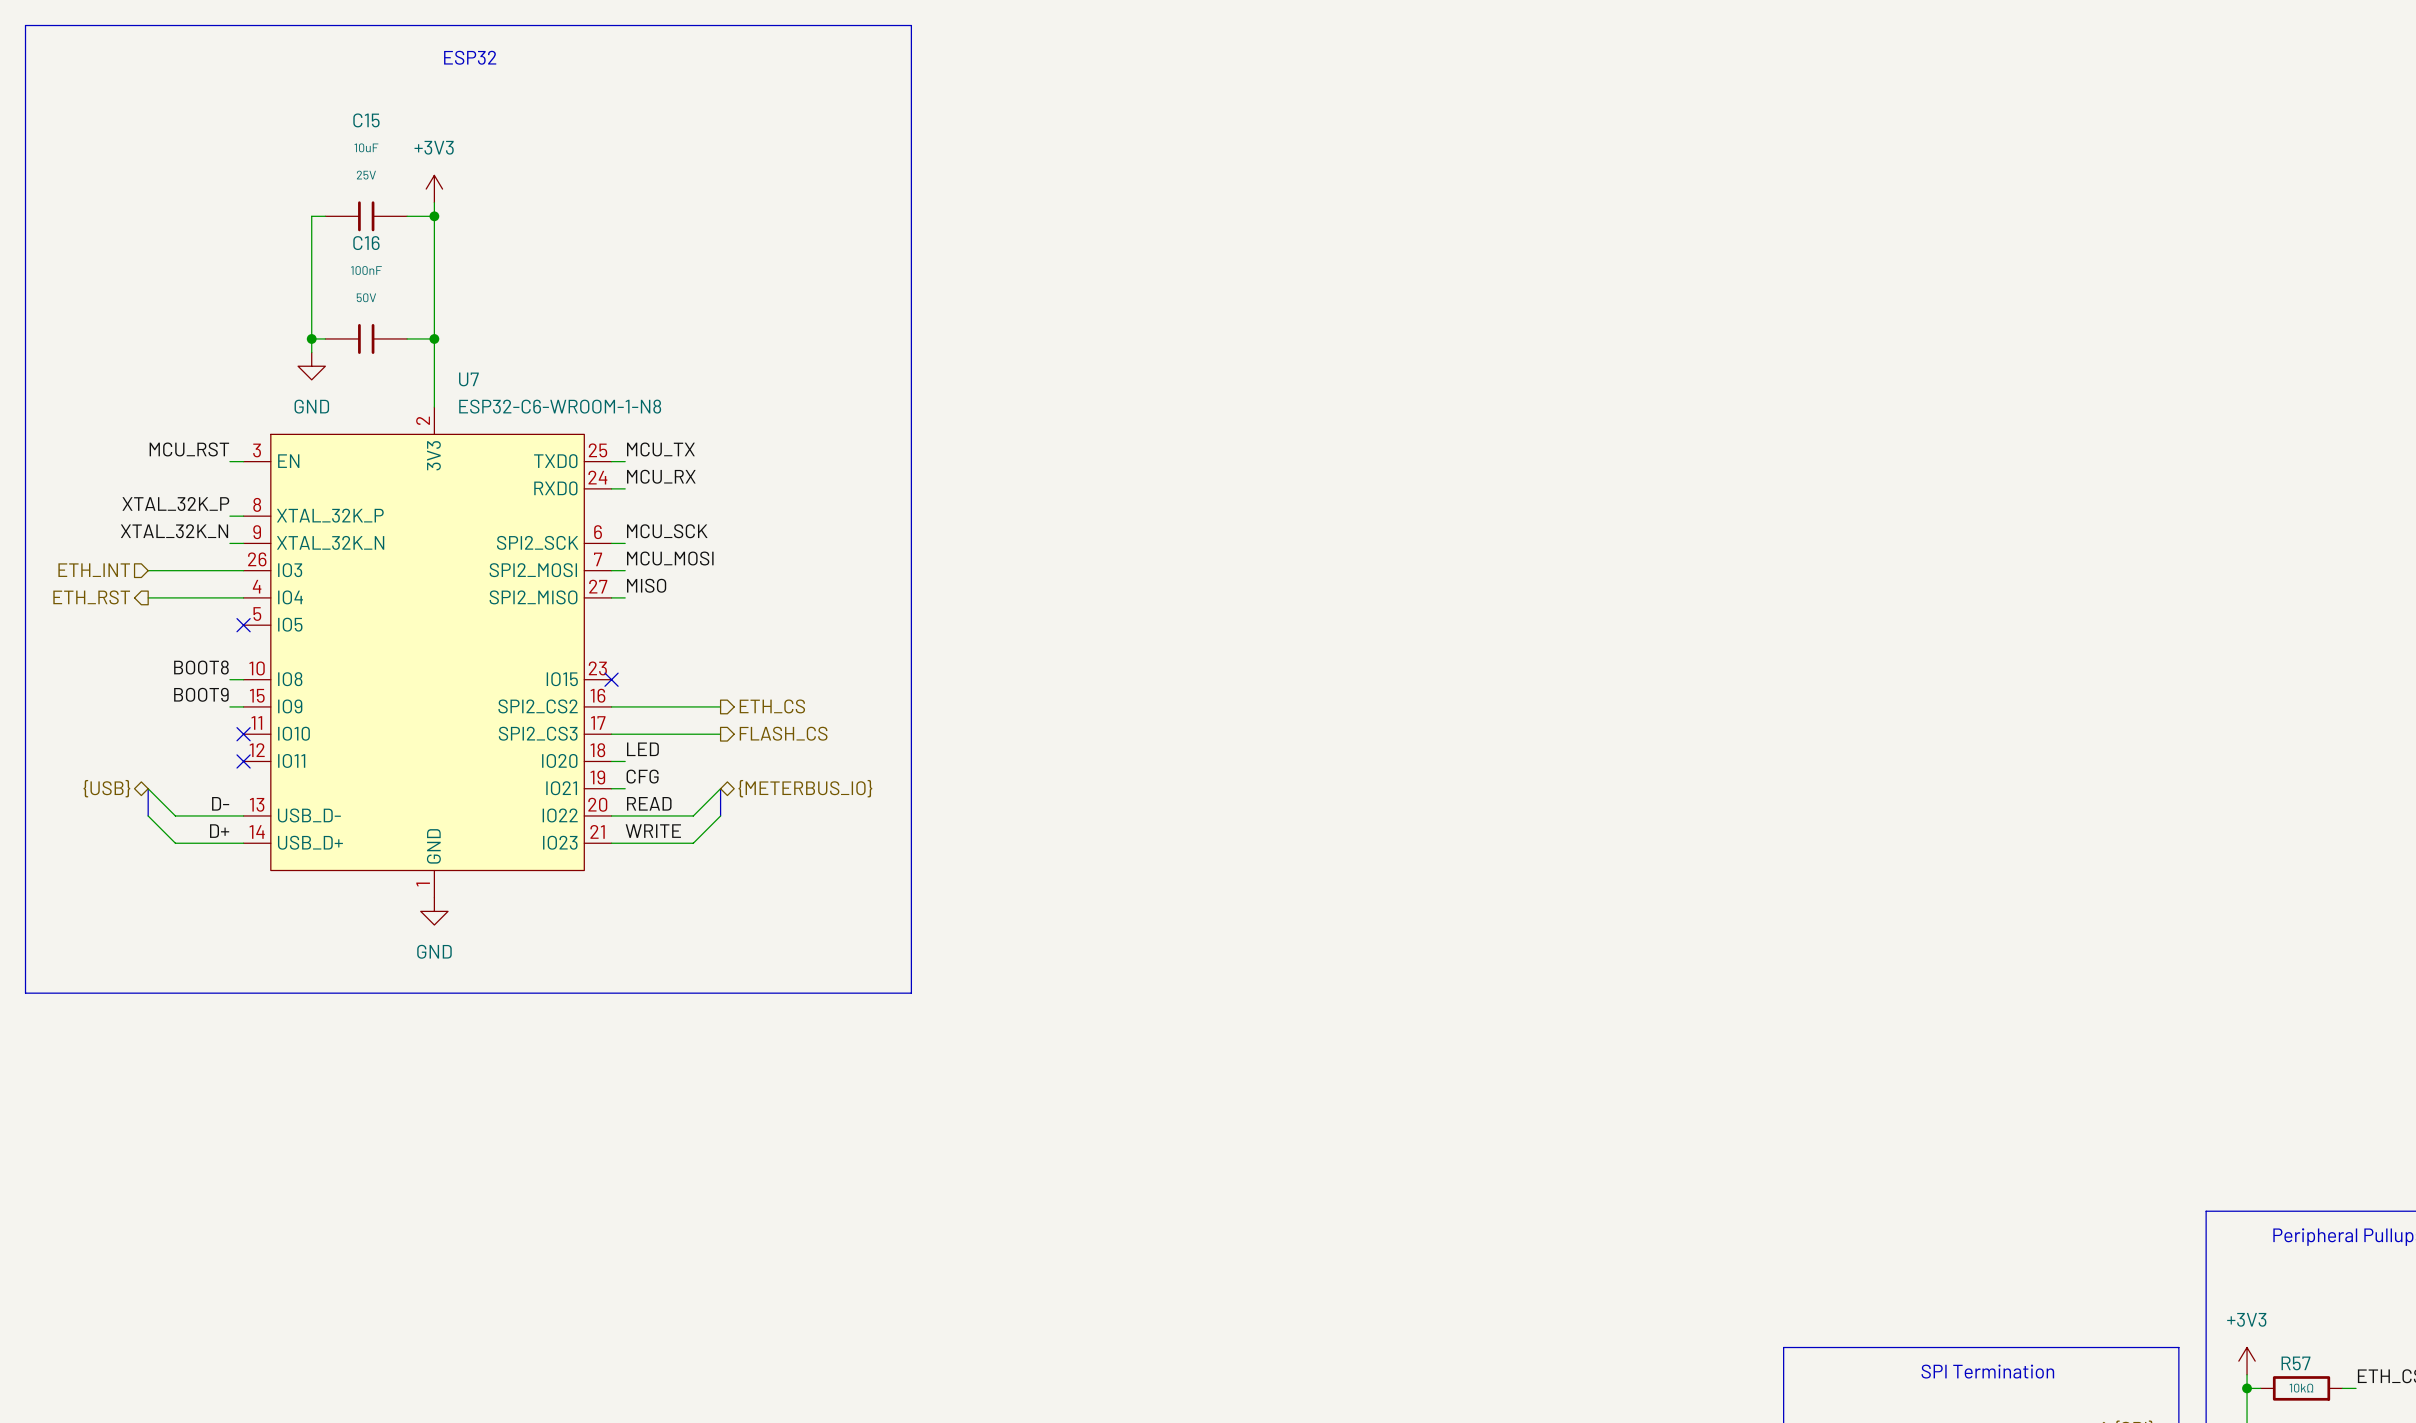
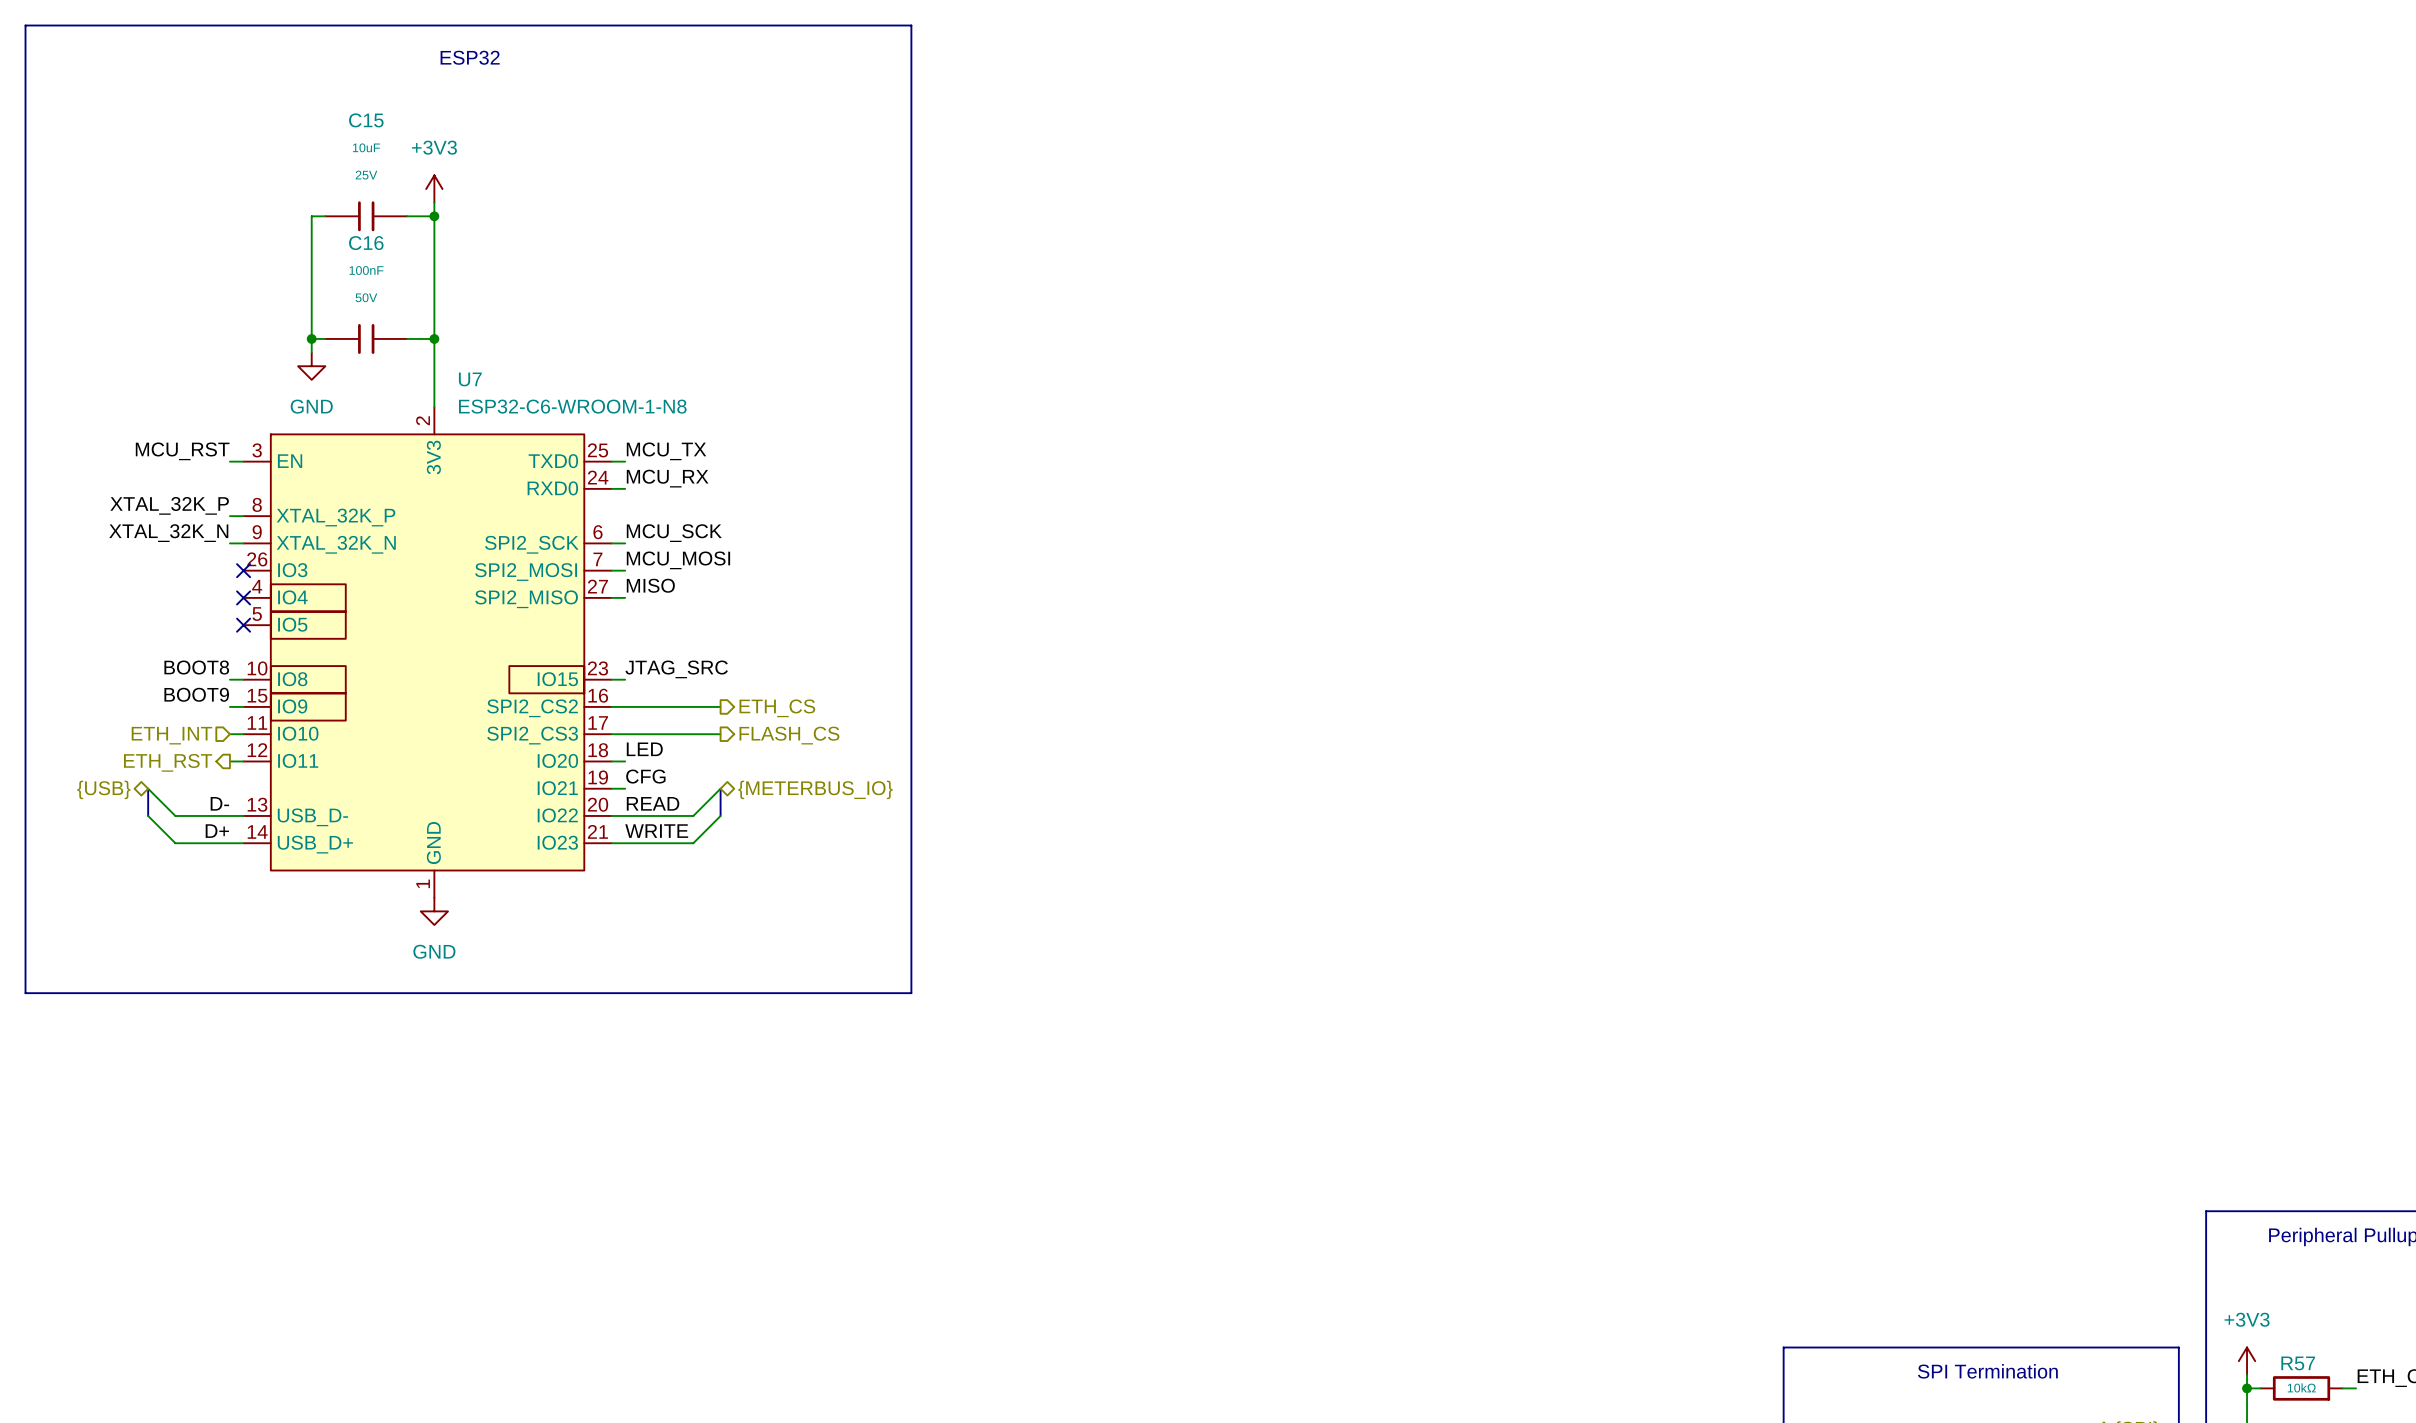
U7 symbol: [243, 407, 612, 898] -> [243, 407, 612, 898]
hierarchical label position: ETH_INT (94, 570) -> ETH_INT (171, 735)
wire: (148, 570) (243, 570) -> none
no-connect mark: none -> (243, 570)
hierarchical label position: ETH_RST (91, 597) -> ETH_RST (168, 762)
wire: (148, 597) (243, 597) -> none
no-connect mark: none -> (243, 597)
label: none -> JTAG_SRC (676, 669)
wire: none -> (611, 679) (625, 679)
no-connect mark: (611, 679) -> none
wire: none -> (229, 734) (243, 734)
no-connect mark: (243, 734) -> none
wire: none -> (229, 761) (243, 761)
no-connect mark: (243, 761) -> none

